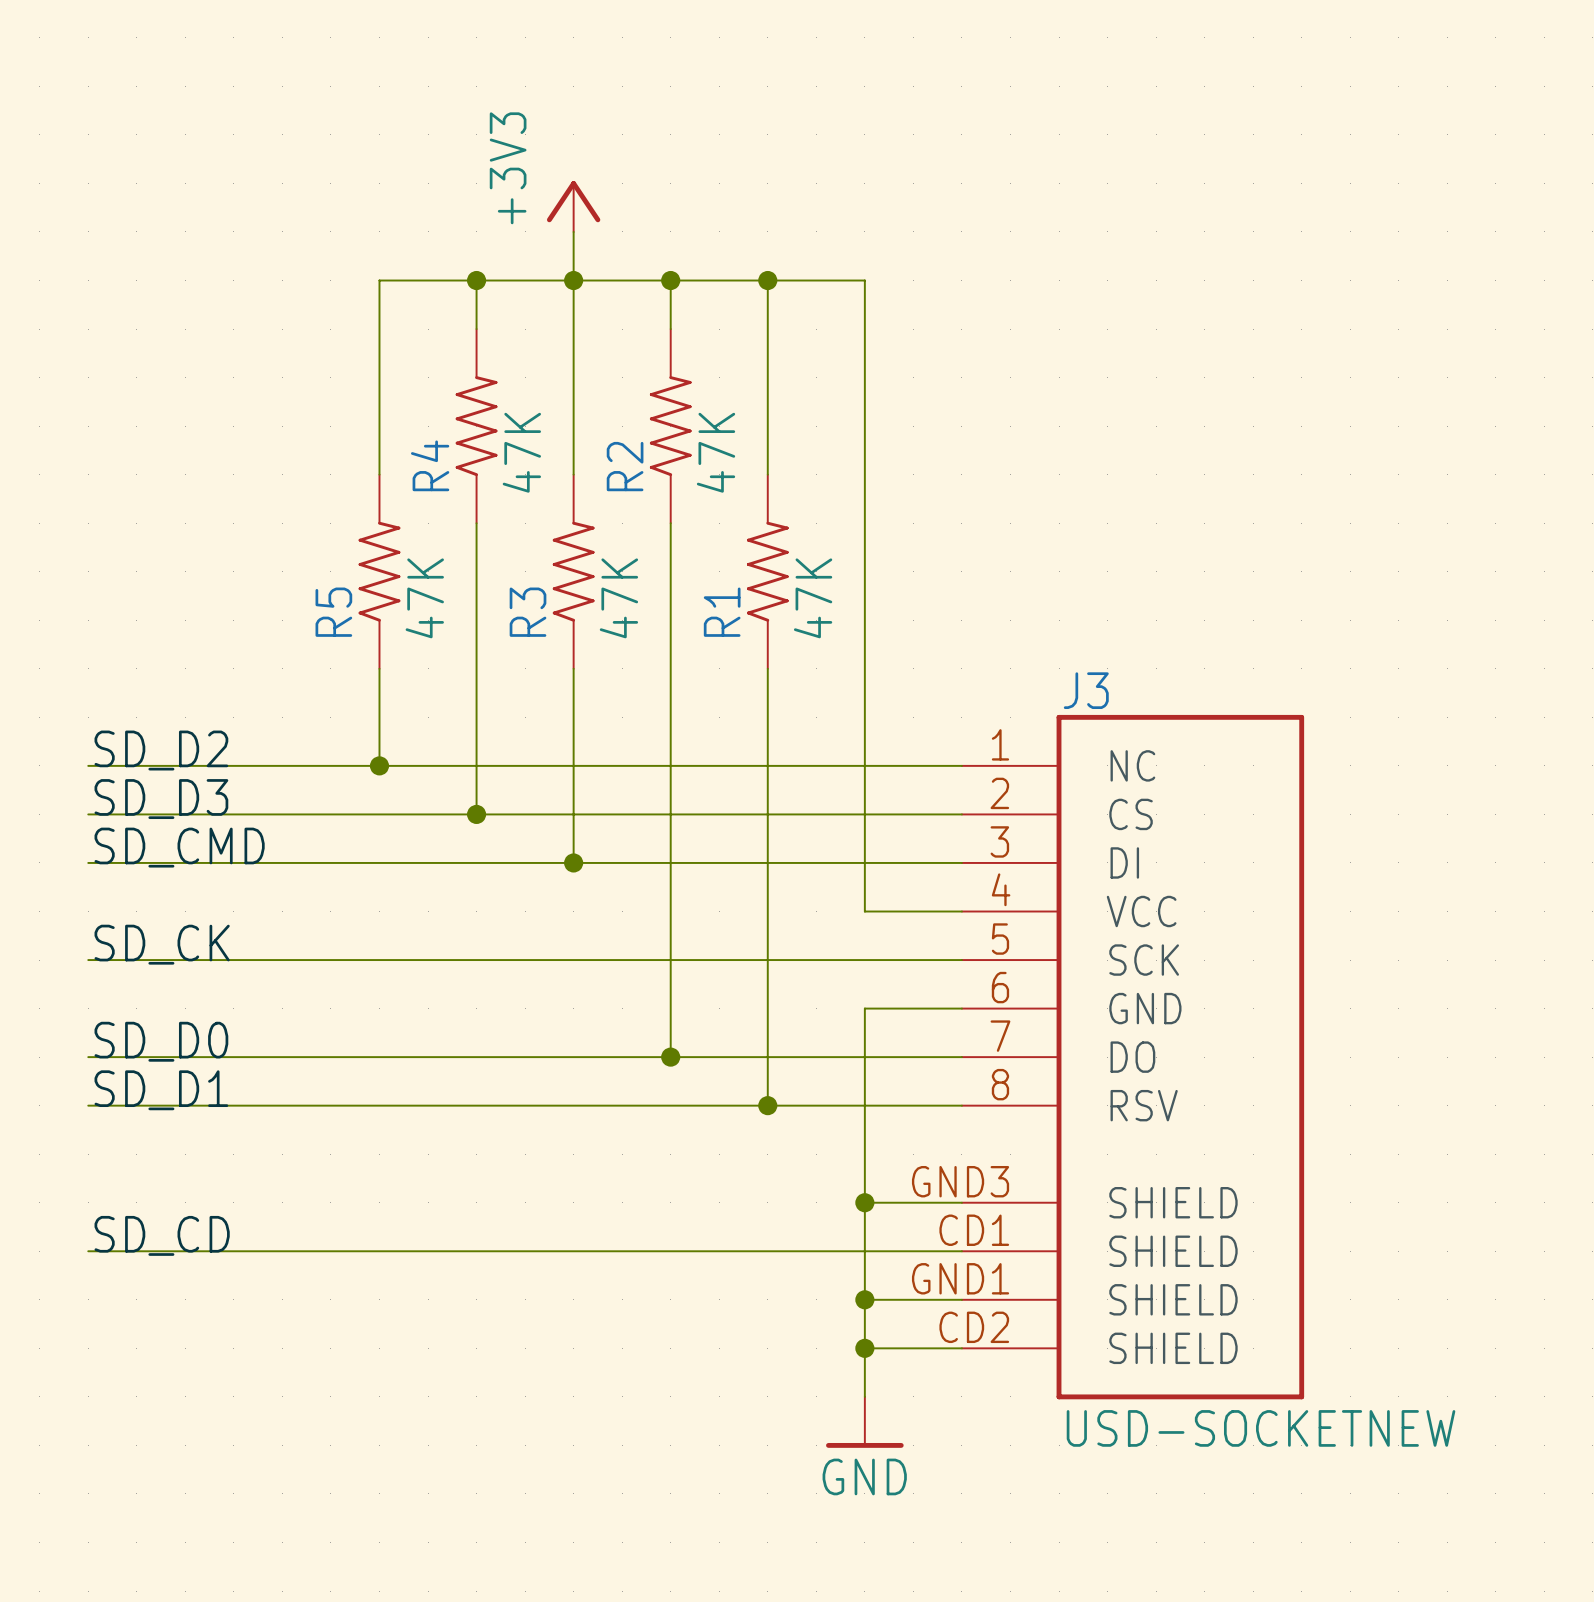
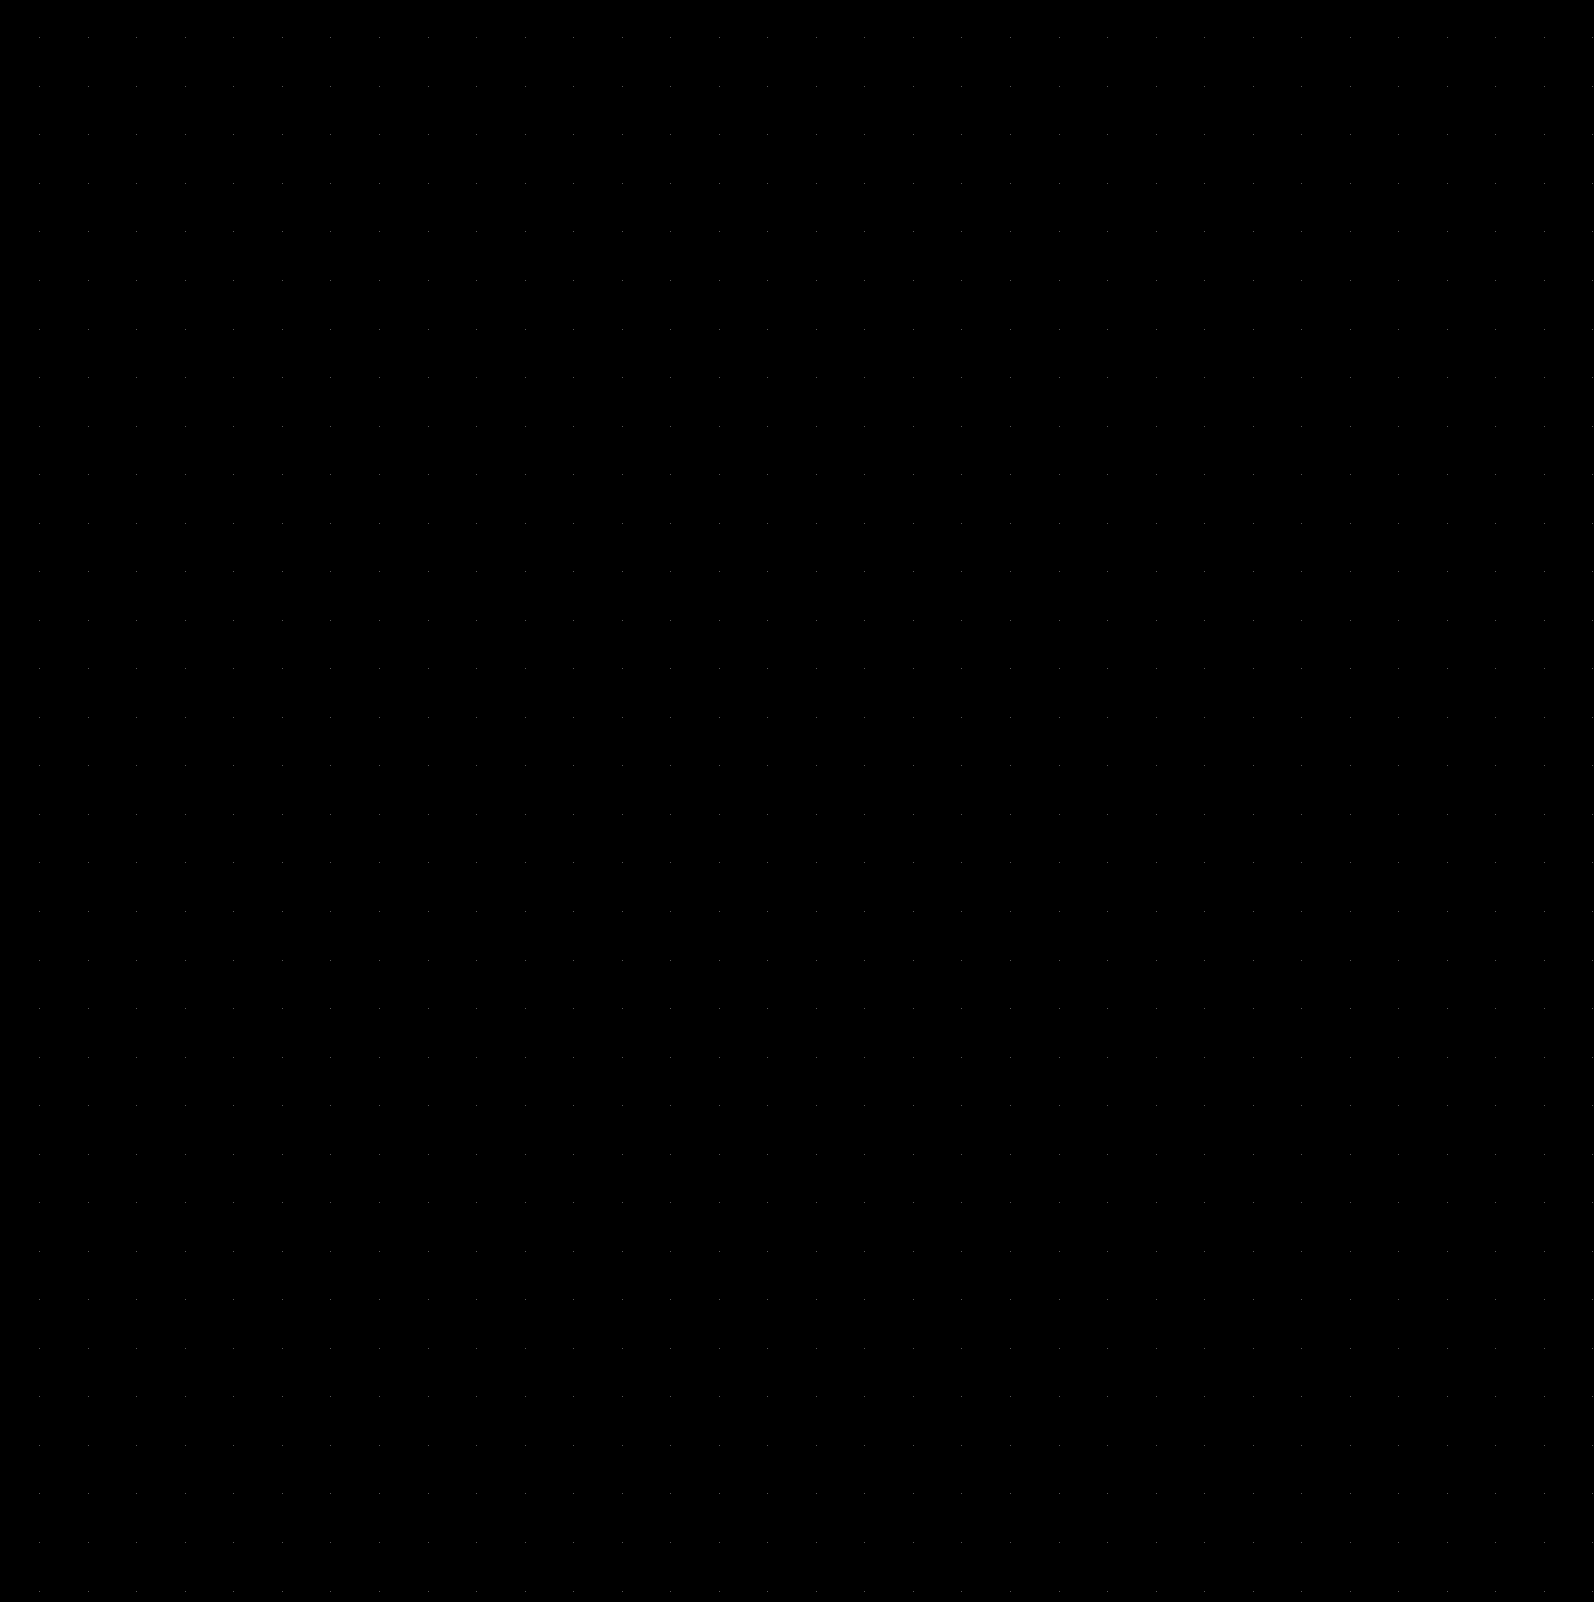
power symbol: +3V3 (573, 206) -> none
wire: (573, 231) (573, 474) -> none
wire: (476, 280) (476, 329) -> none
junction: (476, 280) -> none
junction: (573, 280) -> none
wire: (670, 280) (670, 329) -> none
junction: (670, 280) -> none
wire: (767, 280) (767, 474) -> none
junction: (767, 280) -> none
R4: 47K (476, 426) -> none
R2: 47K (670, 426) -> none
wire: (379, 474) (379, 280) (864, 280) (864, 911) (961, 911) -> none
wire: (476, 523) (476, 814) -> none
wire: (670, 523) (670, 1057) -> none
R5: 47K (379, 571) -> none
R3: 47K (573, 571) -> none
R1: 47K (767, 571) -> none
wire: (379, 668) (379, 765) -> none
wire: (573, 668) (573, 862) -> none
wire: (767, 668) (767, 1105) -> none
label: SD_D2 (161, 750) -> none
wire: (88, 765) (961, 765) -> none
junction: (379, 765) -> none
label: SD_D3 (161, 799) -> none
wire: (88, 814) (961, 814) -> none
junction: (476, 814) -> none
label: SD_CMD (179, 847) -> none
wire: (88, 862) (961, 862) -> none
junction: (573, 862) -> none
label: SD_CK (162, 944) -> none
wire: (88, 960) (961, 960) -> none
wire: (961, 1008) (864, 1008) (864, 1396) -> none
label: SD_D0 (161, 1041) -> none
wire: (88, 1057) (961, 1057) -> none
junction: (670, 1057) -> none
J3: USD-SOCKETNEW (1133, 1057) -> none
label: SD_D1 (161, 1090) -> none
wire: (88, 1105) (961, 1105) -> none
junction: (767, 1105) -> none
wire: (864, 1202) (961, 1202) -> none
junction: (864, 1202) -> none
label: SD_CD (162, 1235) -> none
wire: (88, 1251) (961, 1251) -> none
wire: (864, 1299) (961, 1299) -> none
junction: (864, 1299) -> none
wire: (864, 1348) (961, 1348) -> none
junction: (864, 1348) -> none
power symbol: GND (864, 1422) -> none

